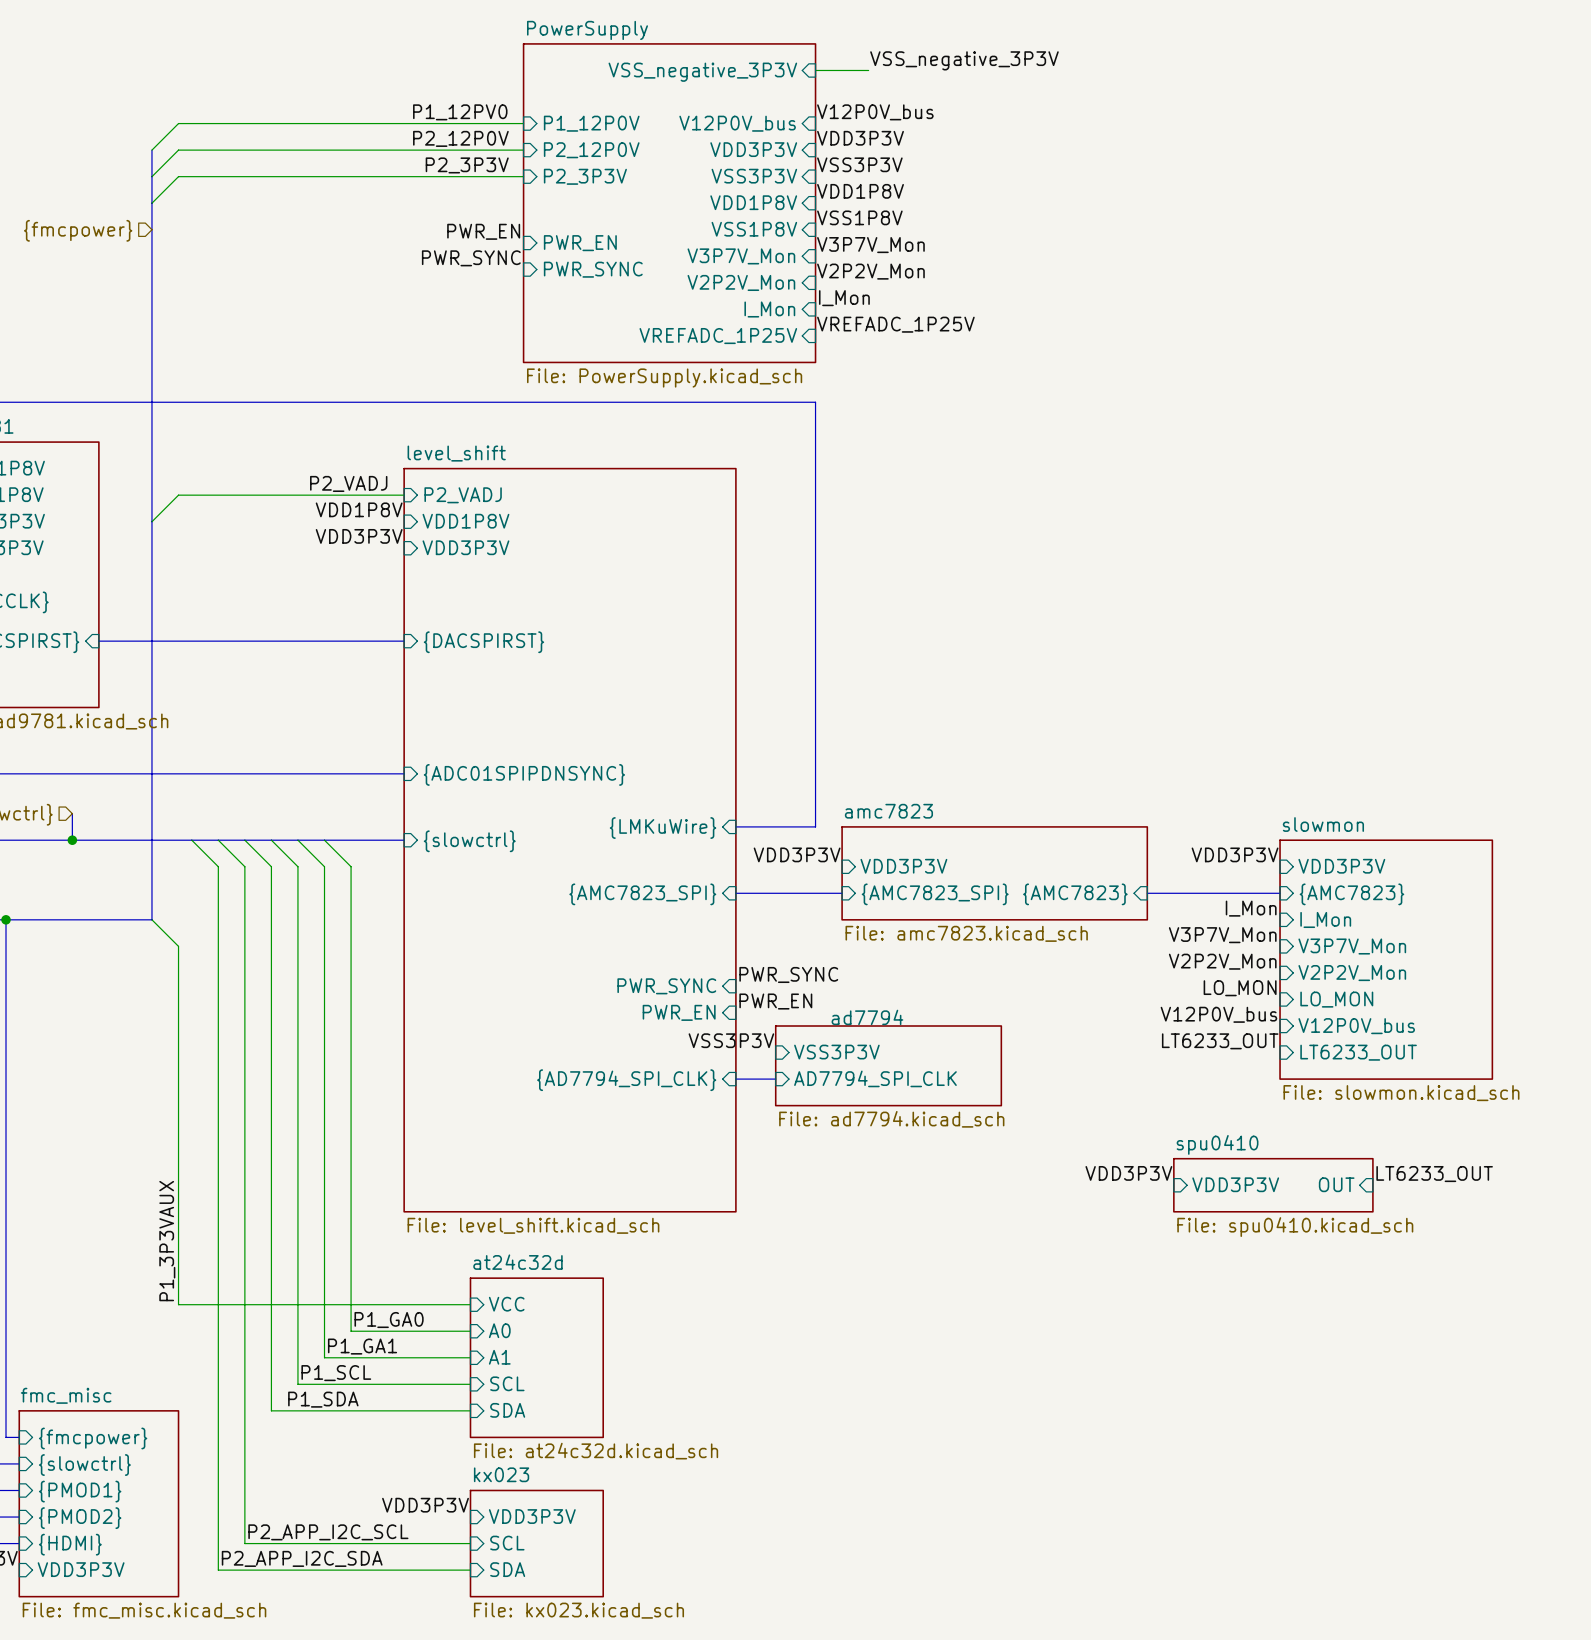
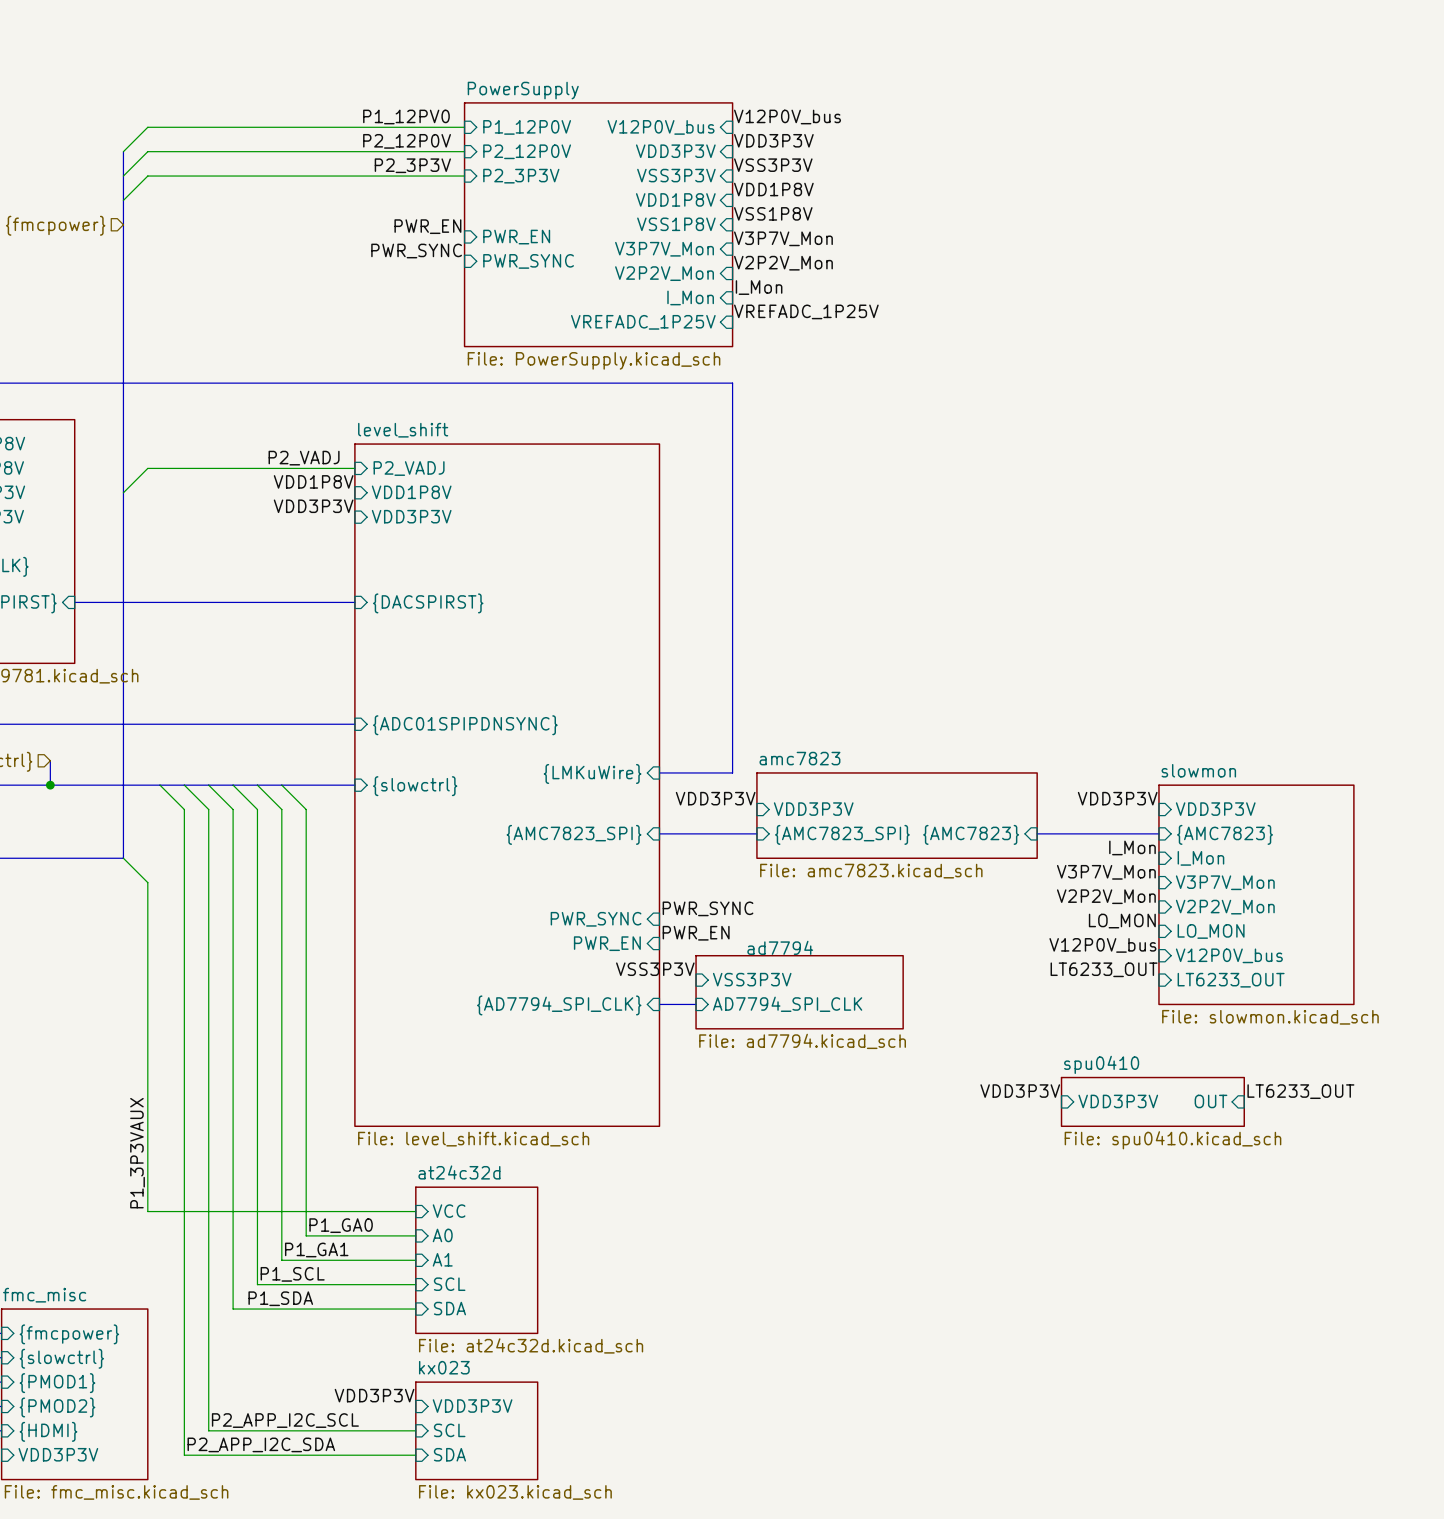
label: VSS_negative_3P3V (964, 60) -> none
wire: (815, 70) (868, 70) -> none
sheet pin: VSS_negative_3P3V (702, 72) -> none
sheet PowerSupply: File: PowerSupply.kicad_sch (669, 203) -> none
sheet PowerSupply: none -> File: PowerSupply.kicad_sch (598, 224)

